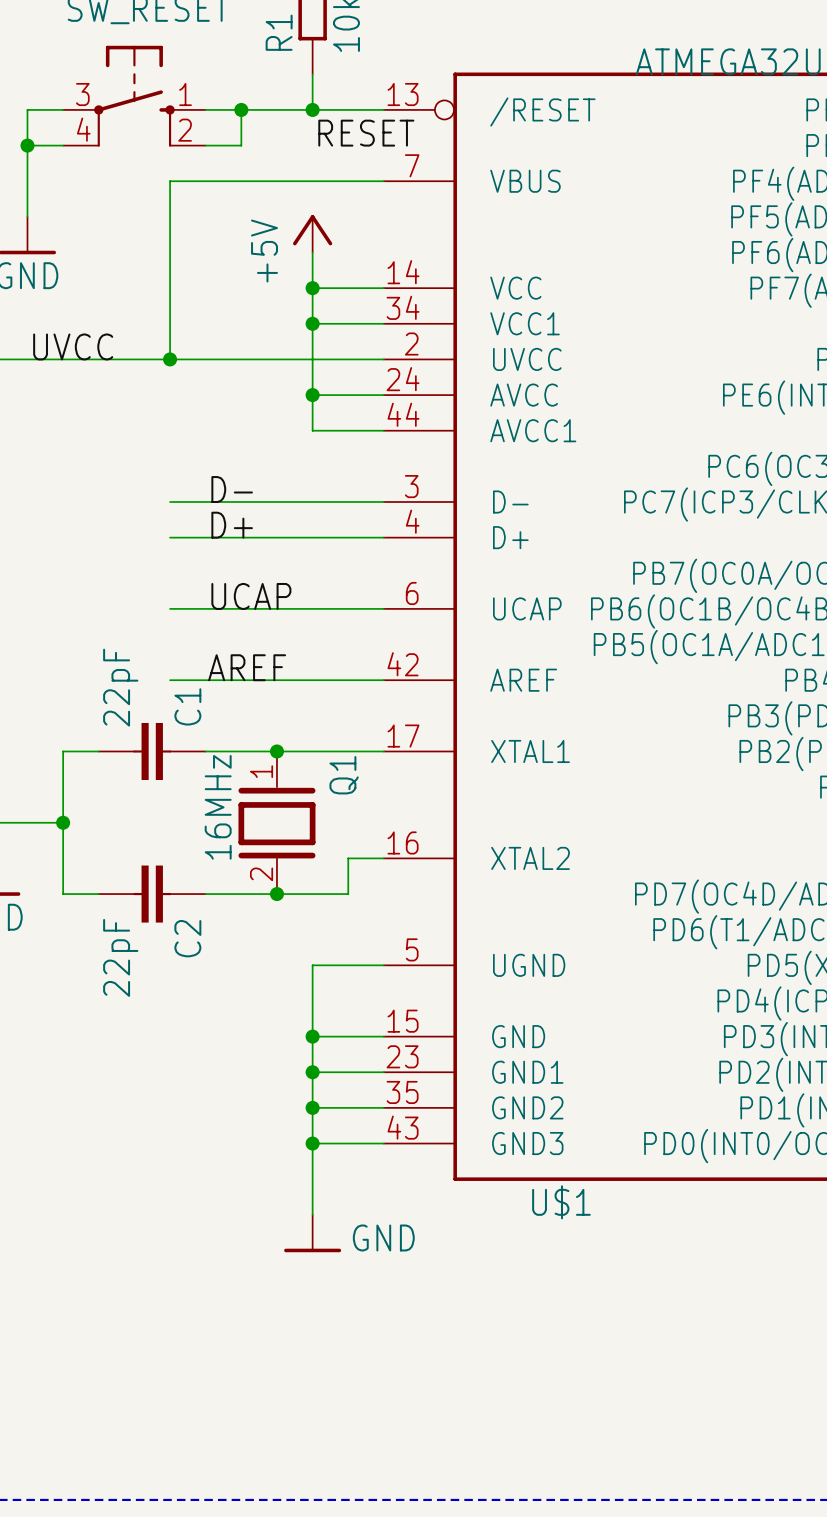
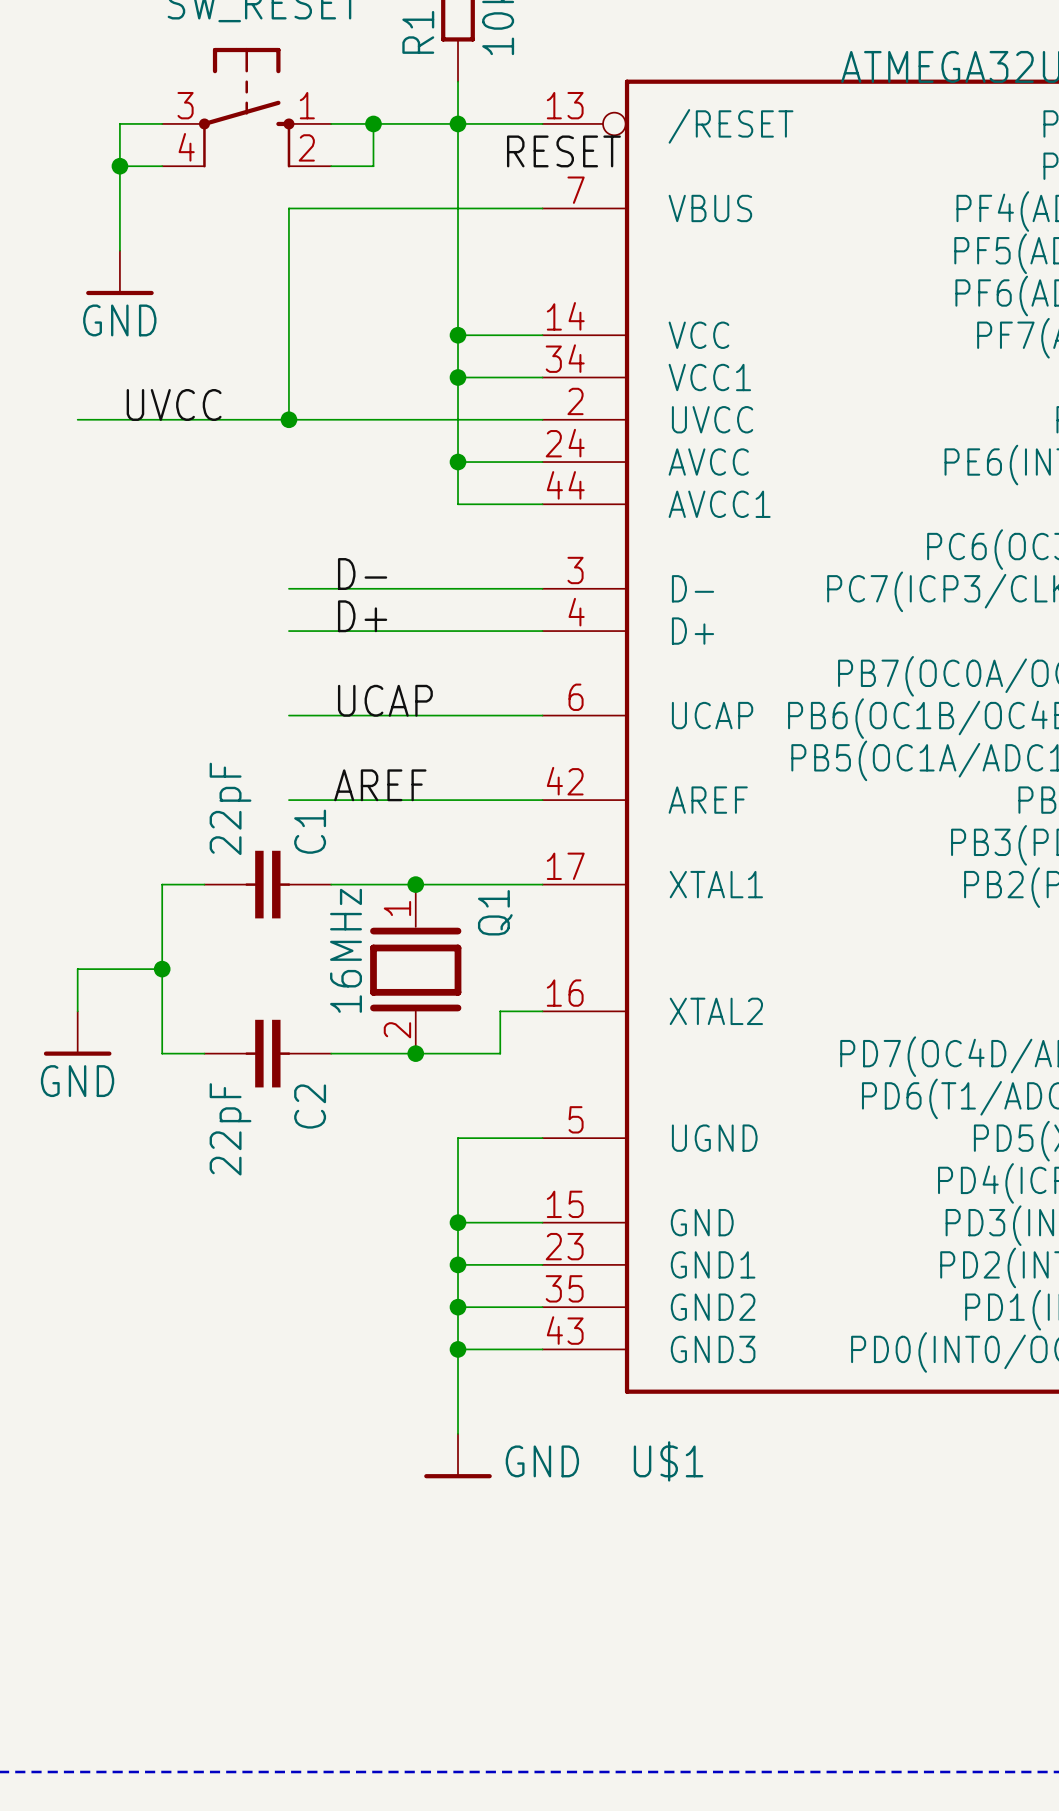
wire: none -> (458, 123) (458, 292)
label position: RESET (366, 133) -> RESET (563, 151)
power symbol: +5V (312, 233) -> none
U$1 name position: U$1 (561, 1202) -> U$1 (668, 1461)

